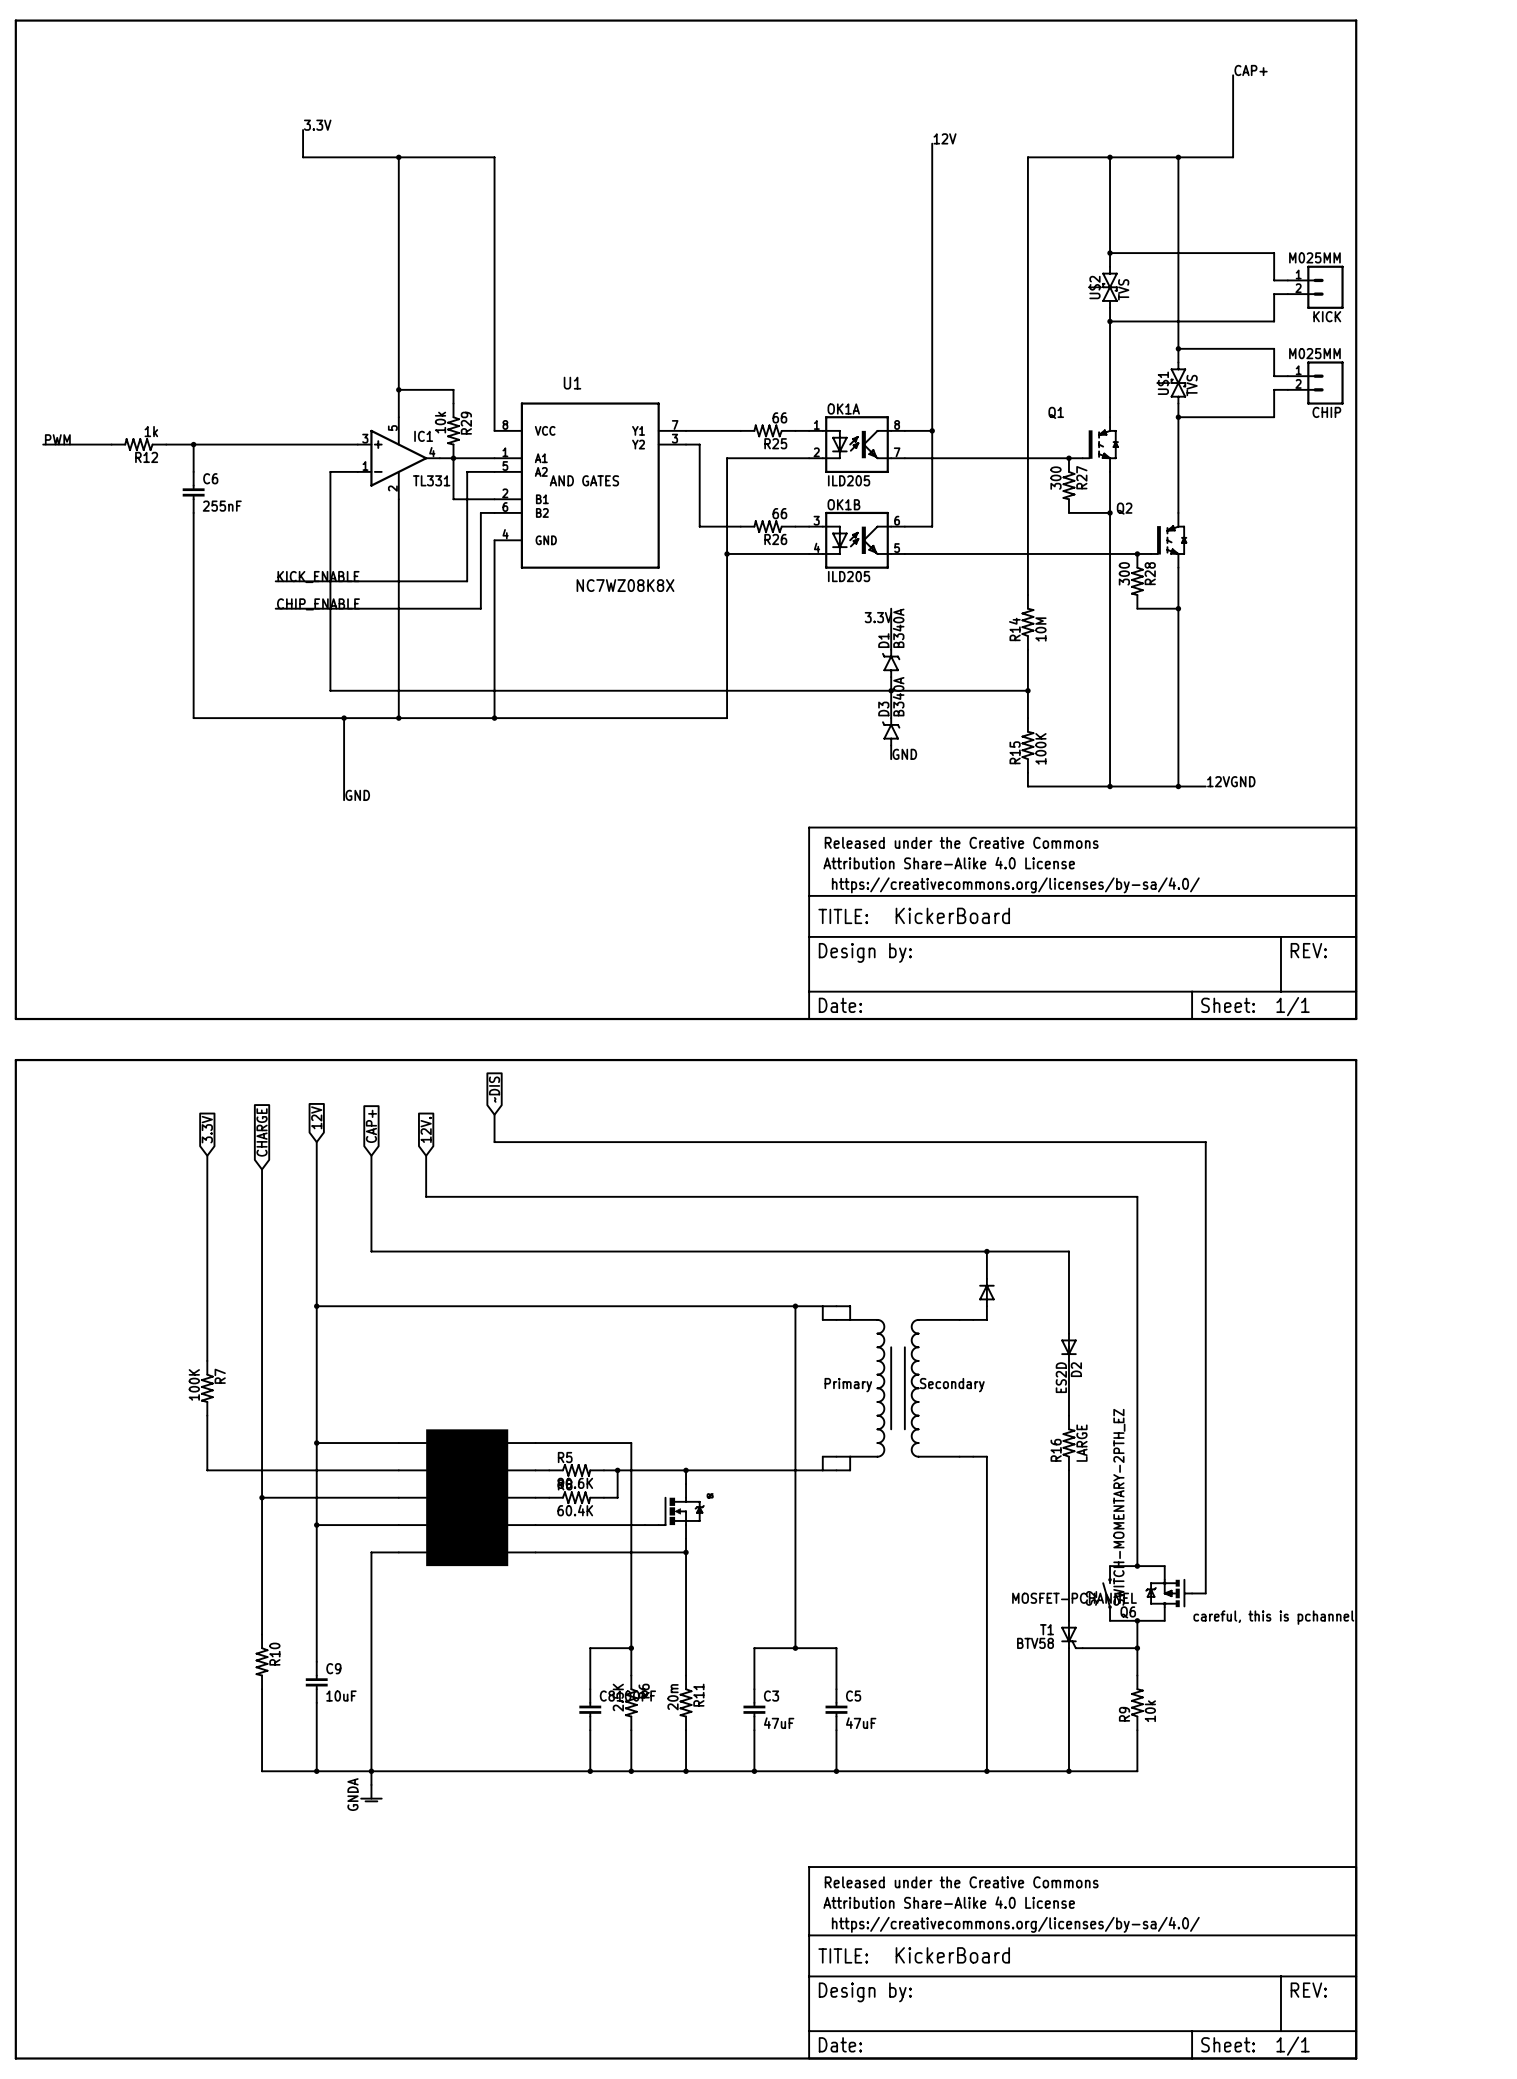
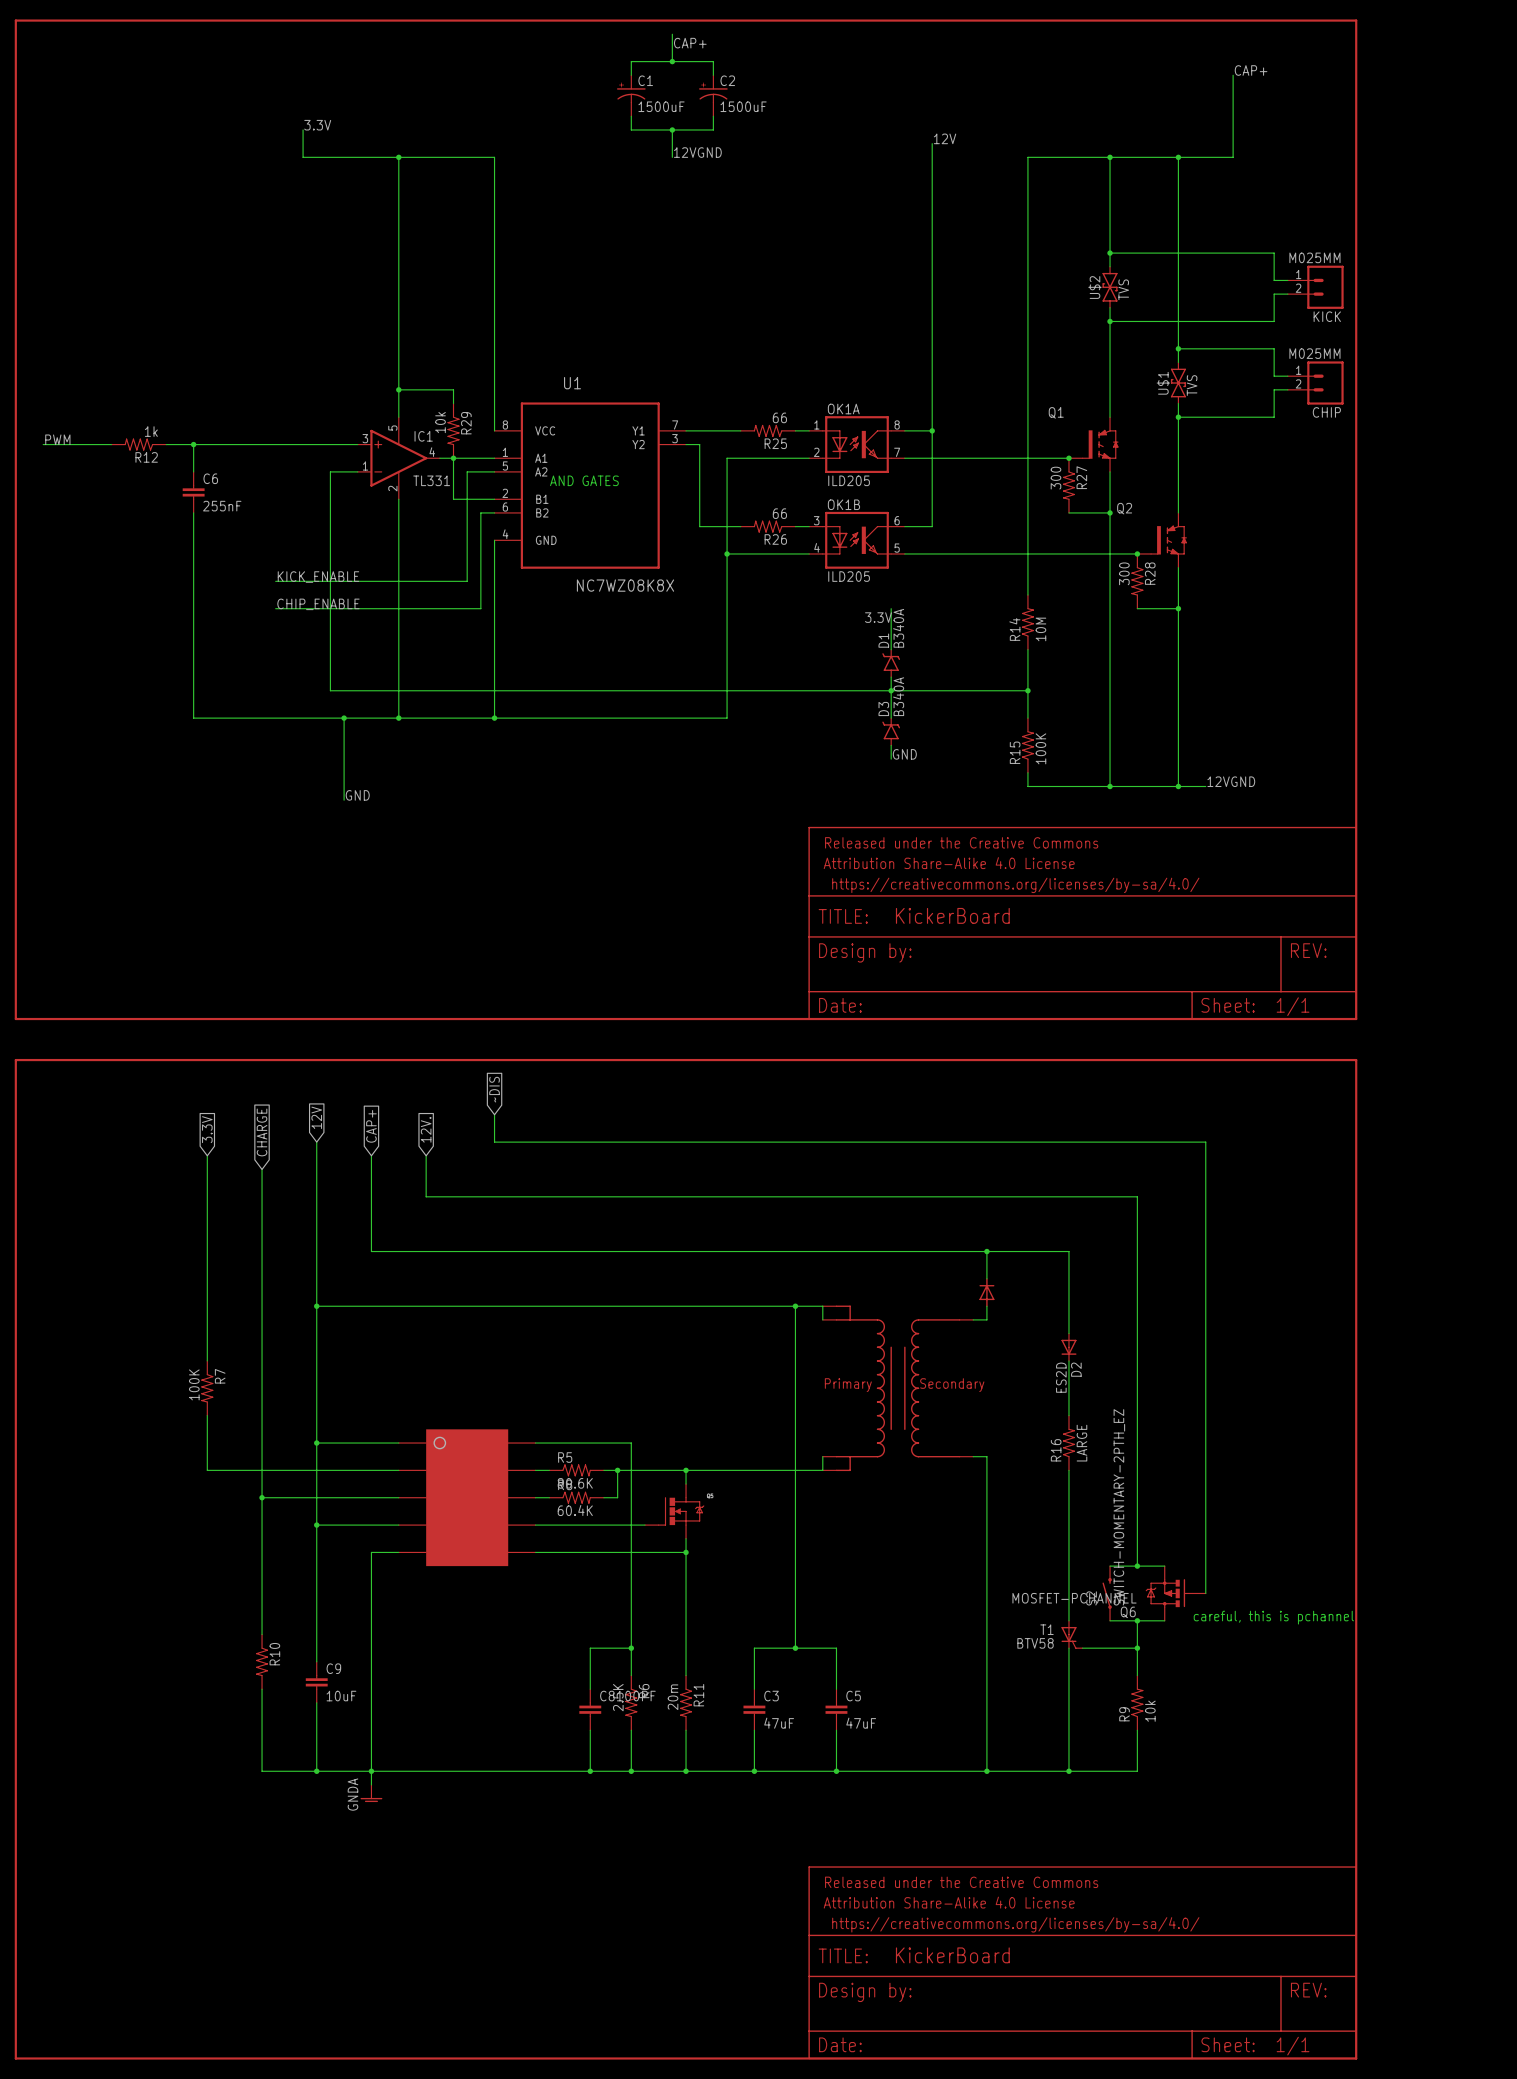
wire: none -> (672, 34) (672, 61)
label: none -> CAP+ (690, 43)
junction: none -> (672, 61)
wire: none -> (631, 75) (631, 61) (713, 61) (713, 75)
C1: none -> 1500uF (631, 95)
C2: none -> 1500uF (713, 95)
wire: none -> (631, 116) (631, 129) (713, 129) (713, 116)
wire: none -> (672, 129) (672, 157)
junction: none -> (672, 129)
label: none -> 12VGND (697, 152)

